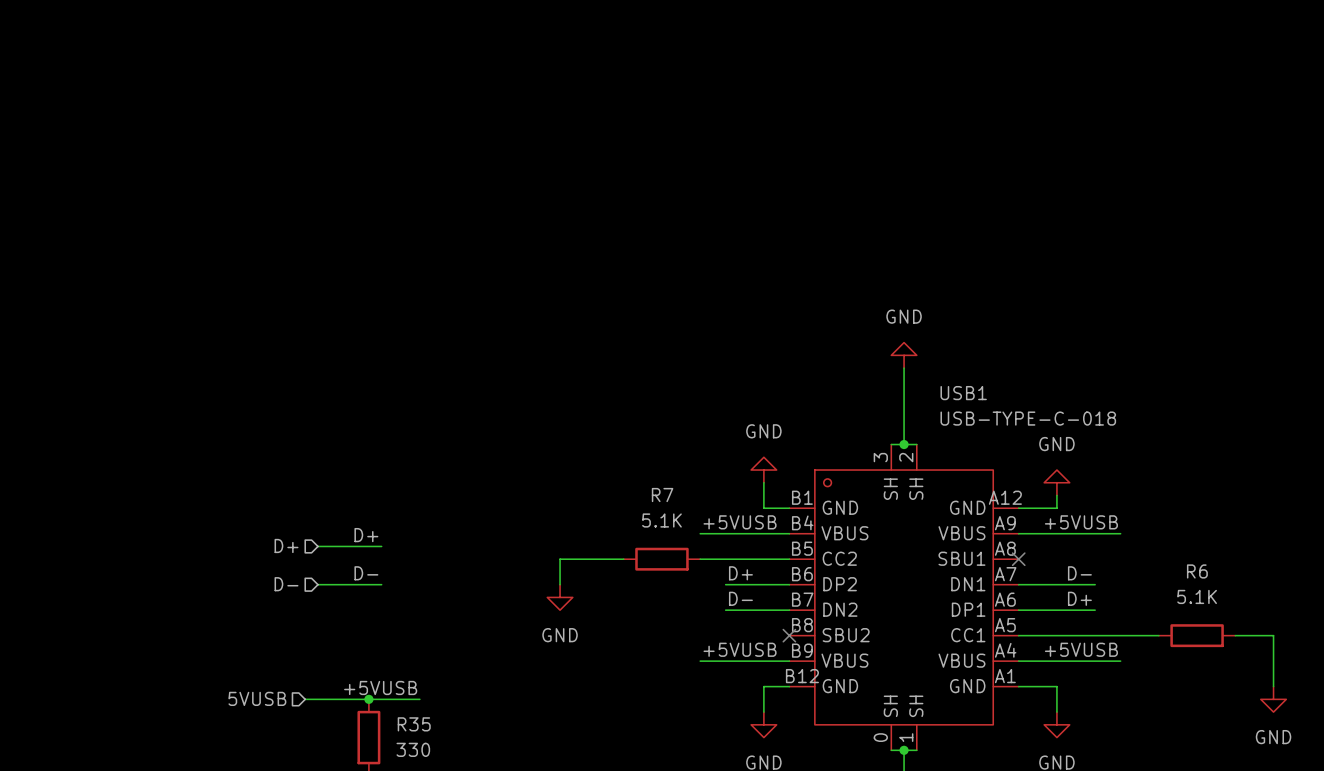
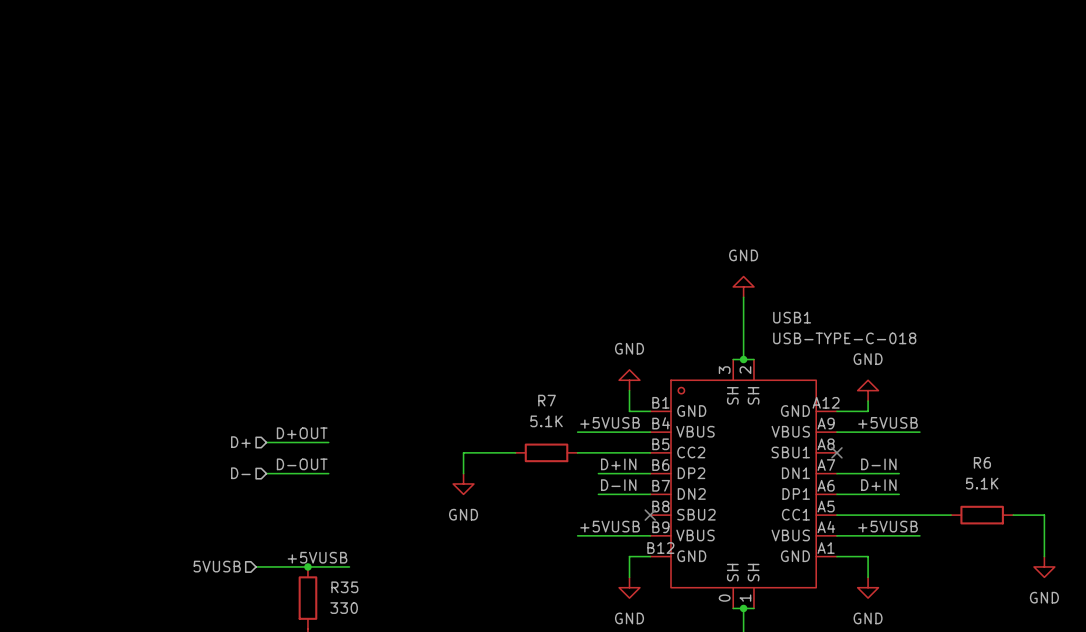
label: none -> D+OUT (302, 433)
label: D+ (366, 535) -> none
wire: none -> (318, 442) (328, 442)
label: none -> D-OUT (302, 464)
label: D- (366, 573) -> none
label: D+ (740, 573) -> D+IN (618, 464)
label: D- (1079, 573) -> D-IN (878, 464)
wire: none -> (318, 473) (328, 473)
label: D- (740, 598) -> D-IN (618, 485)
label: D+ (1079, 598) -> D+IN (878, 485)

